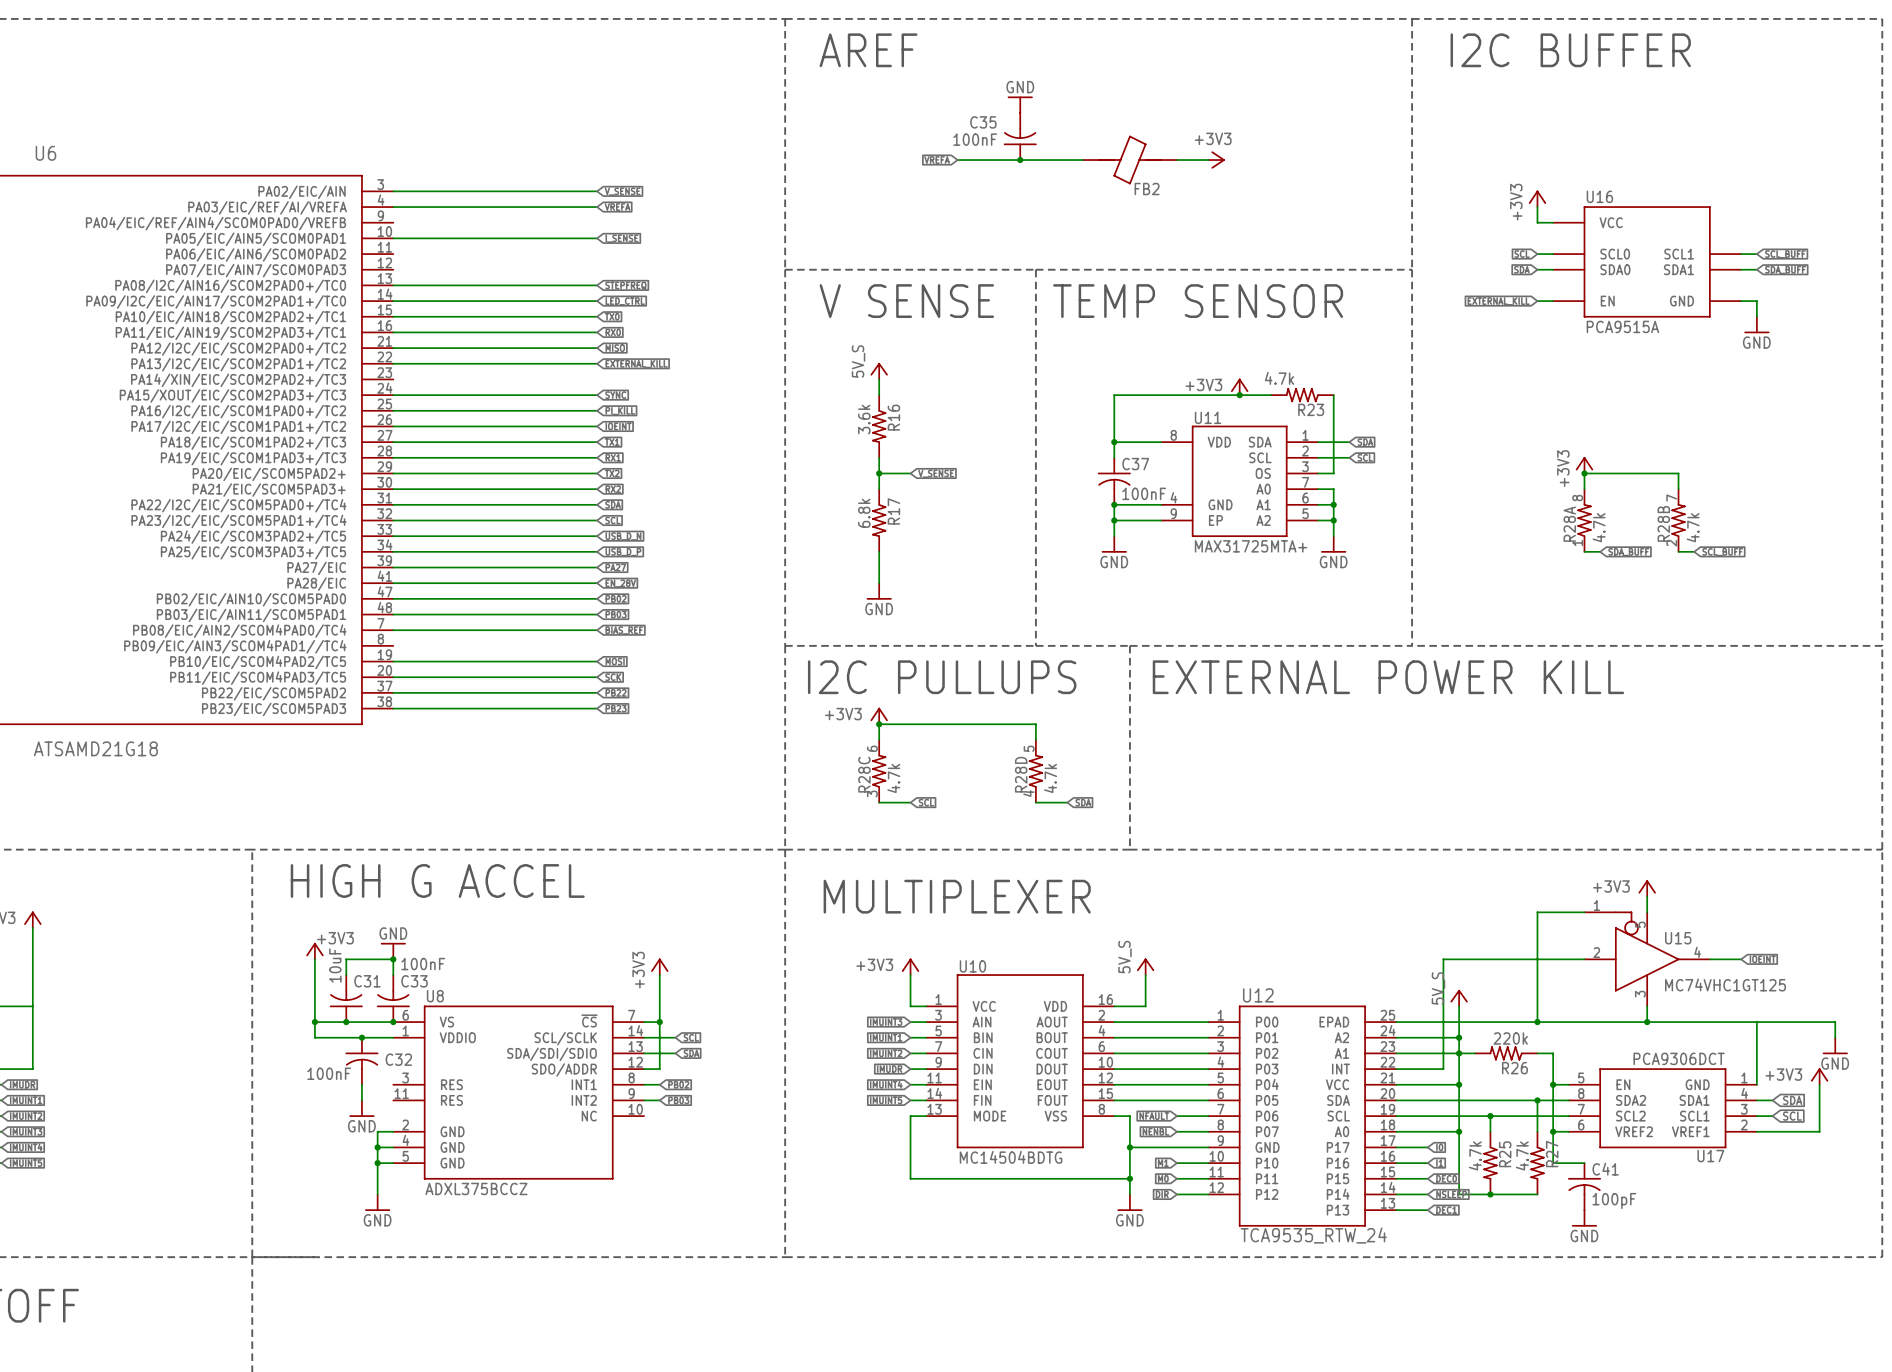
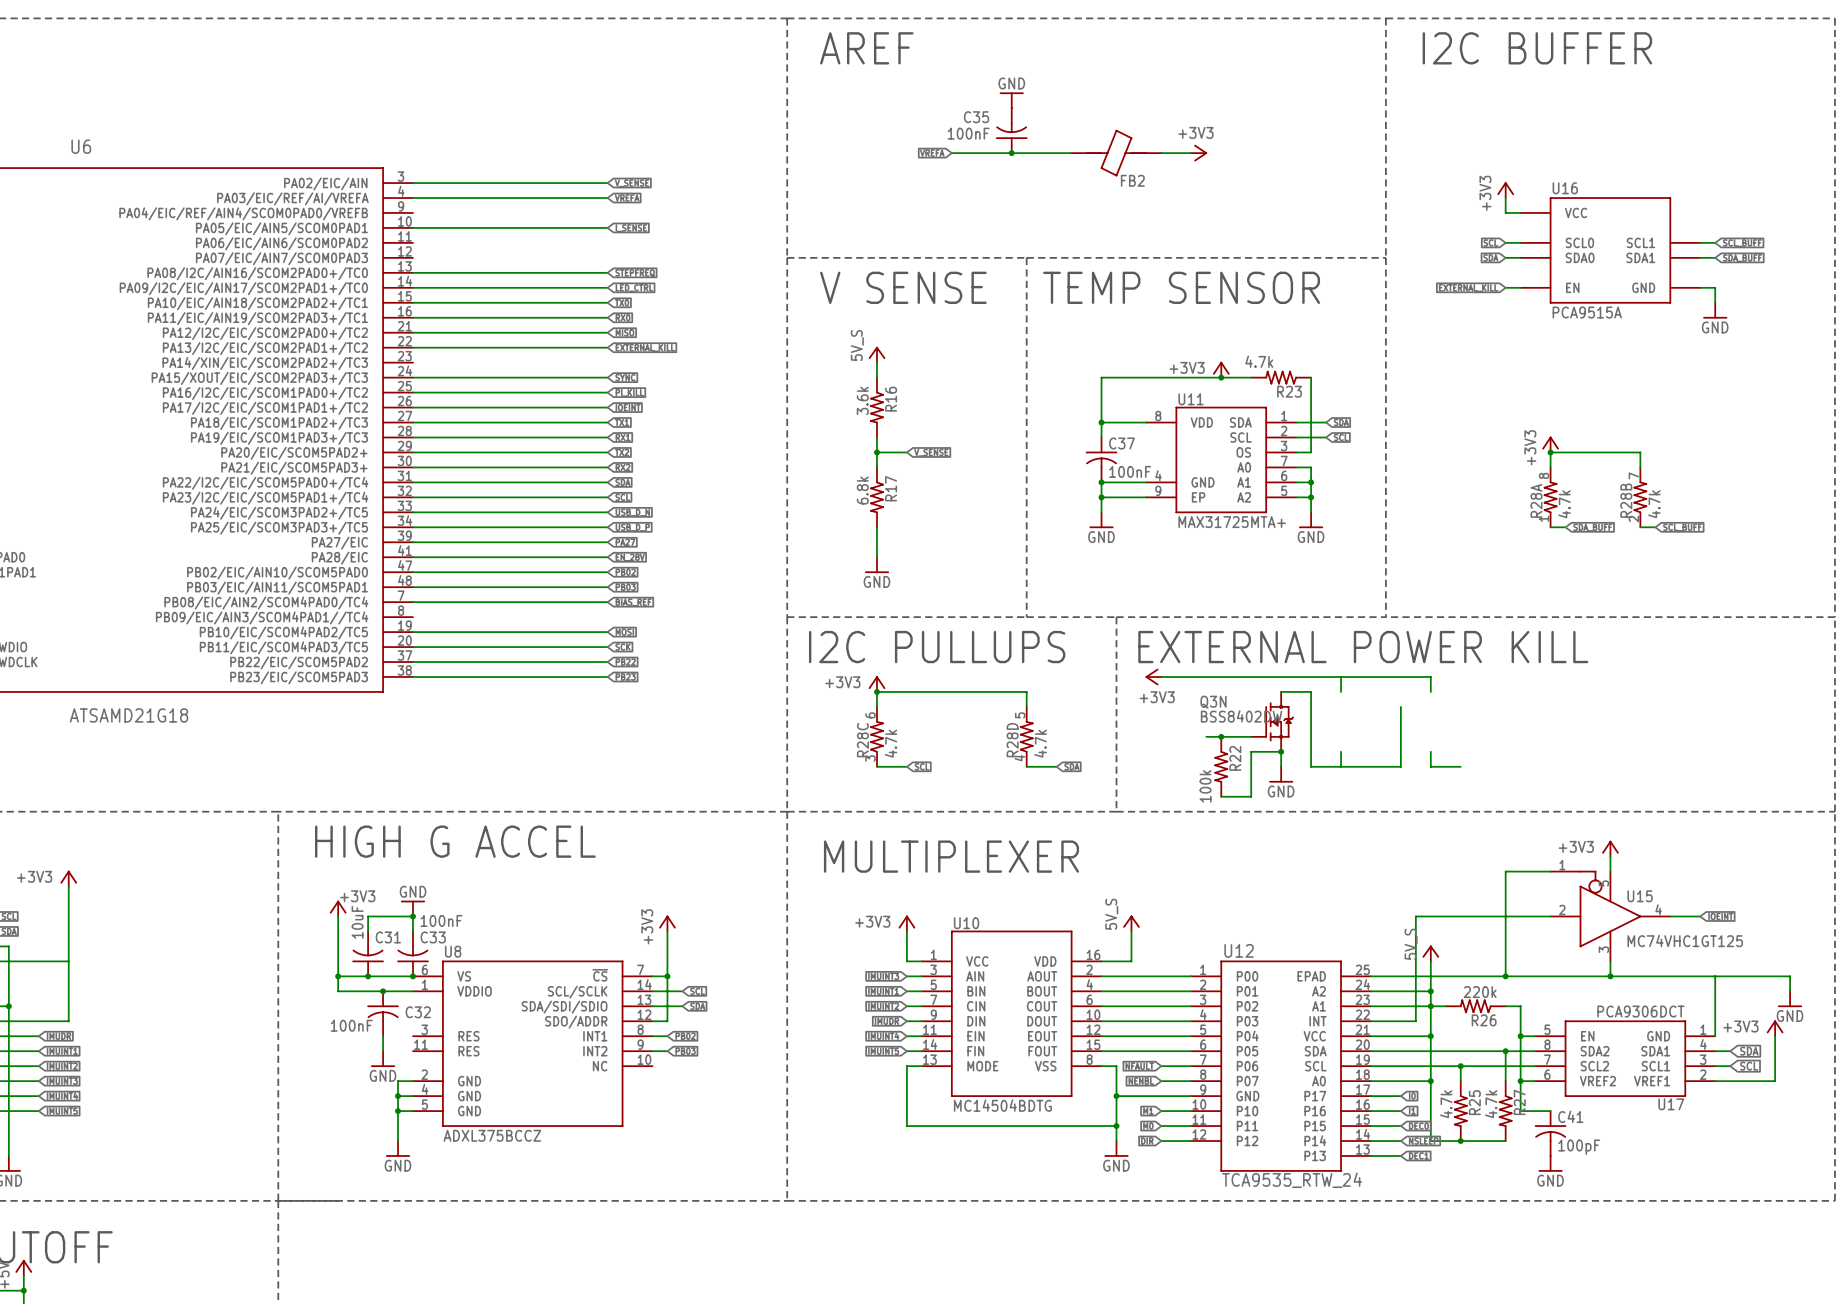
power symbol: none -> +3V3 (1153, 676)
wire: none -> (1161, 676) (1430, 676) (1430, 691)
wire: none -> (1341, 676) (1341, 691)
wire: none -> (1281, 691) (1311, 691) (1311, 766) (1400, 766) (1400, 706)
Q3N: none -> BSS8402DW (1272, 721)
wire: none -> (1206, 736) (1251, 736)
junction: none -> (1221, 736)
junction: none -> (1281, 751)
wire: none -> (1341, 751) (1341, 766)
wire: none -> (1430, 751) (1430, 766) (1460, 766)
R22: none -> 100k (1221, 766)
wire: none -> (1281, 766) (1281, 751) (1251, 751) (1251, 796) (1221, 796)
power symbol: none -> GND (1281, 774)

